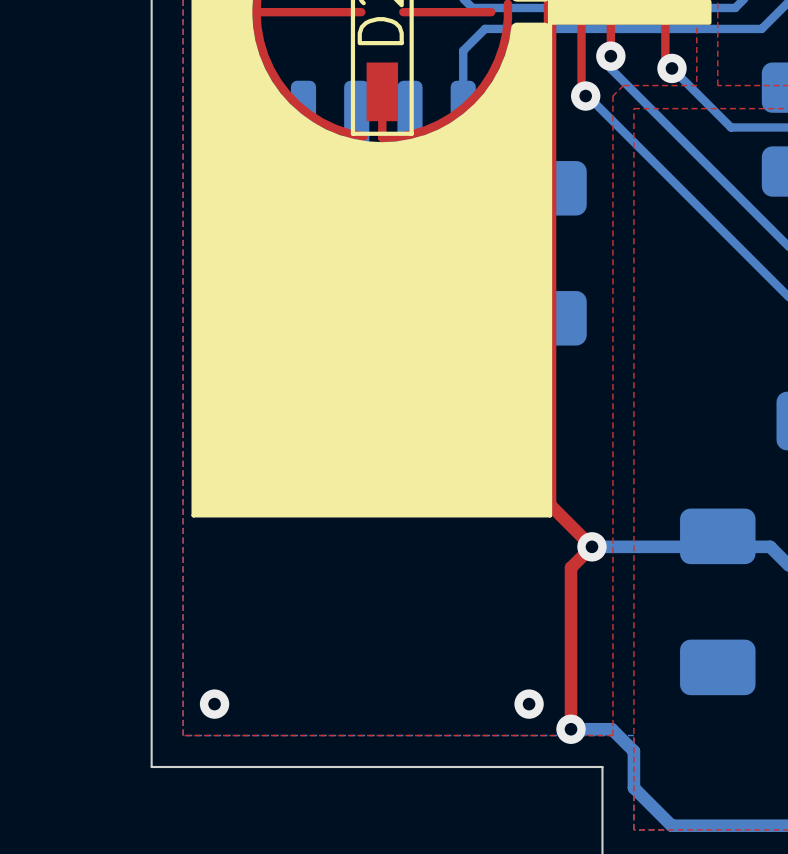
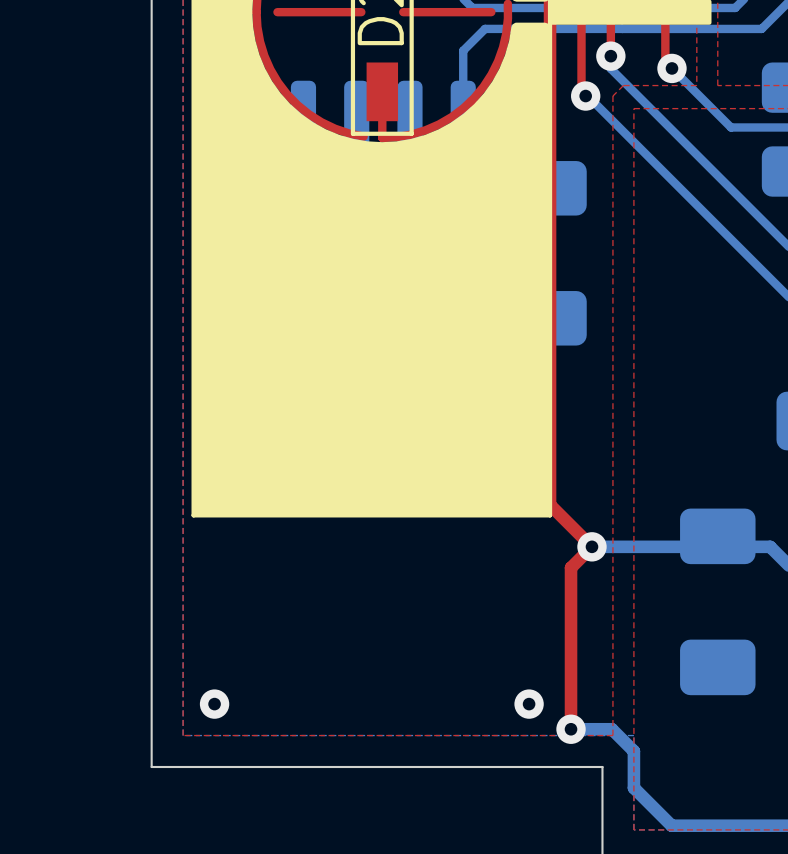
top track: (256, 12) (277, 12) -> none

